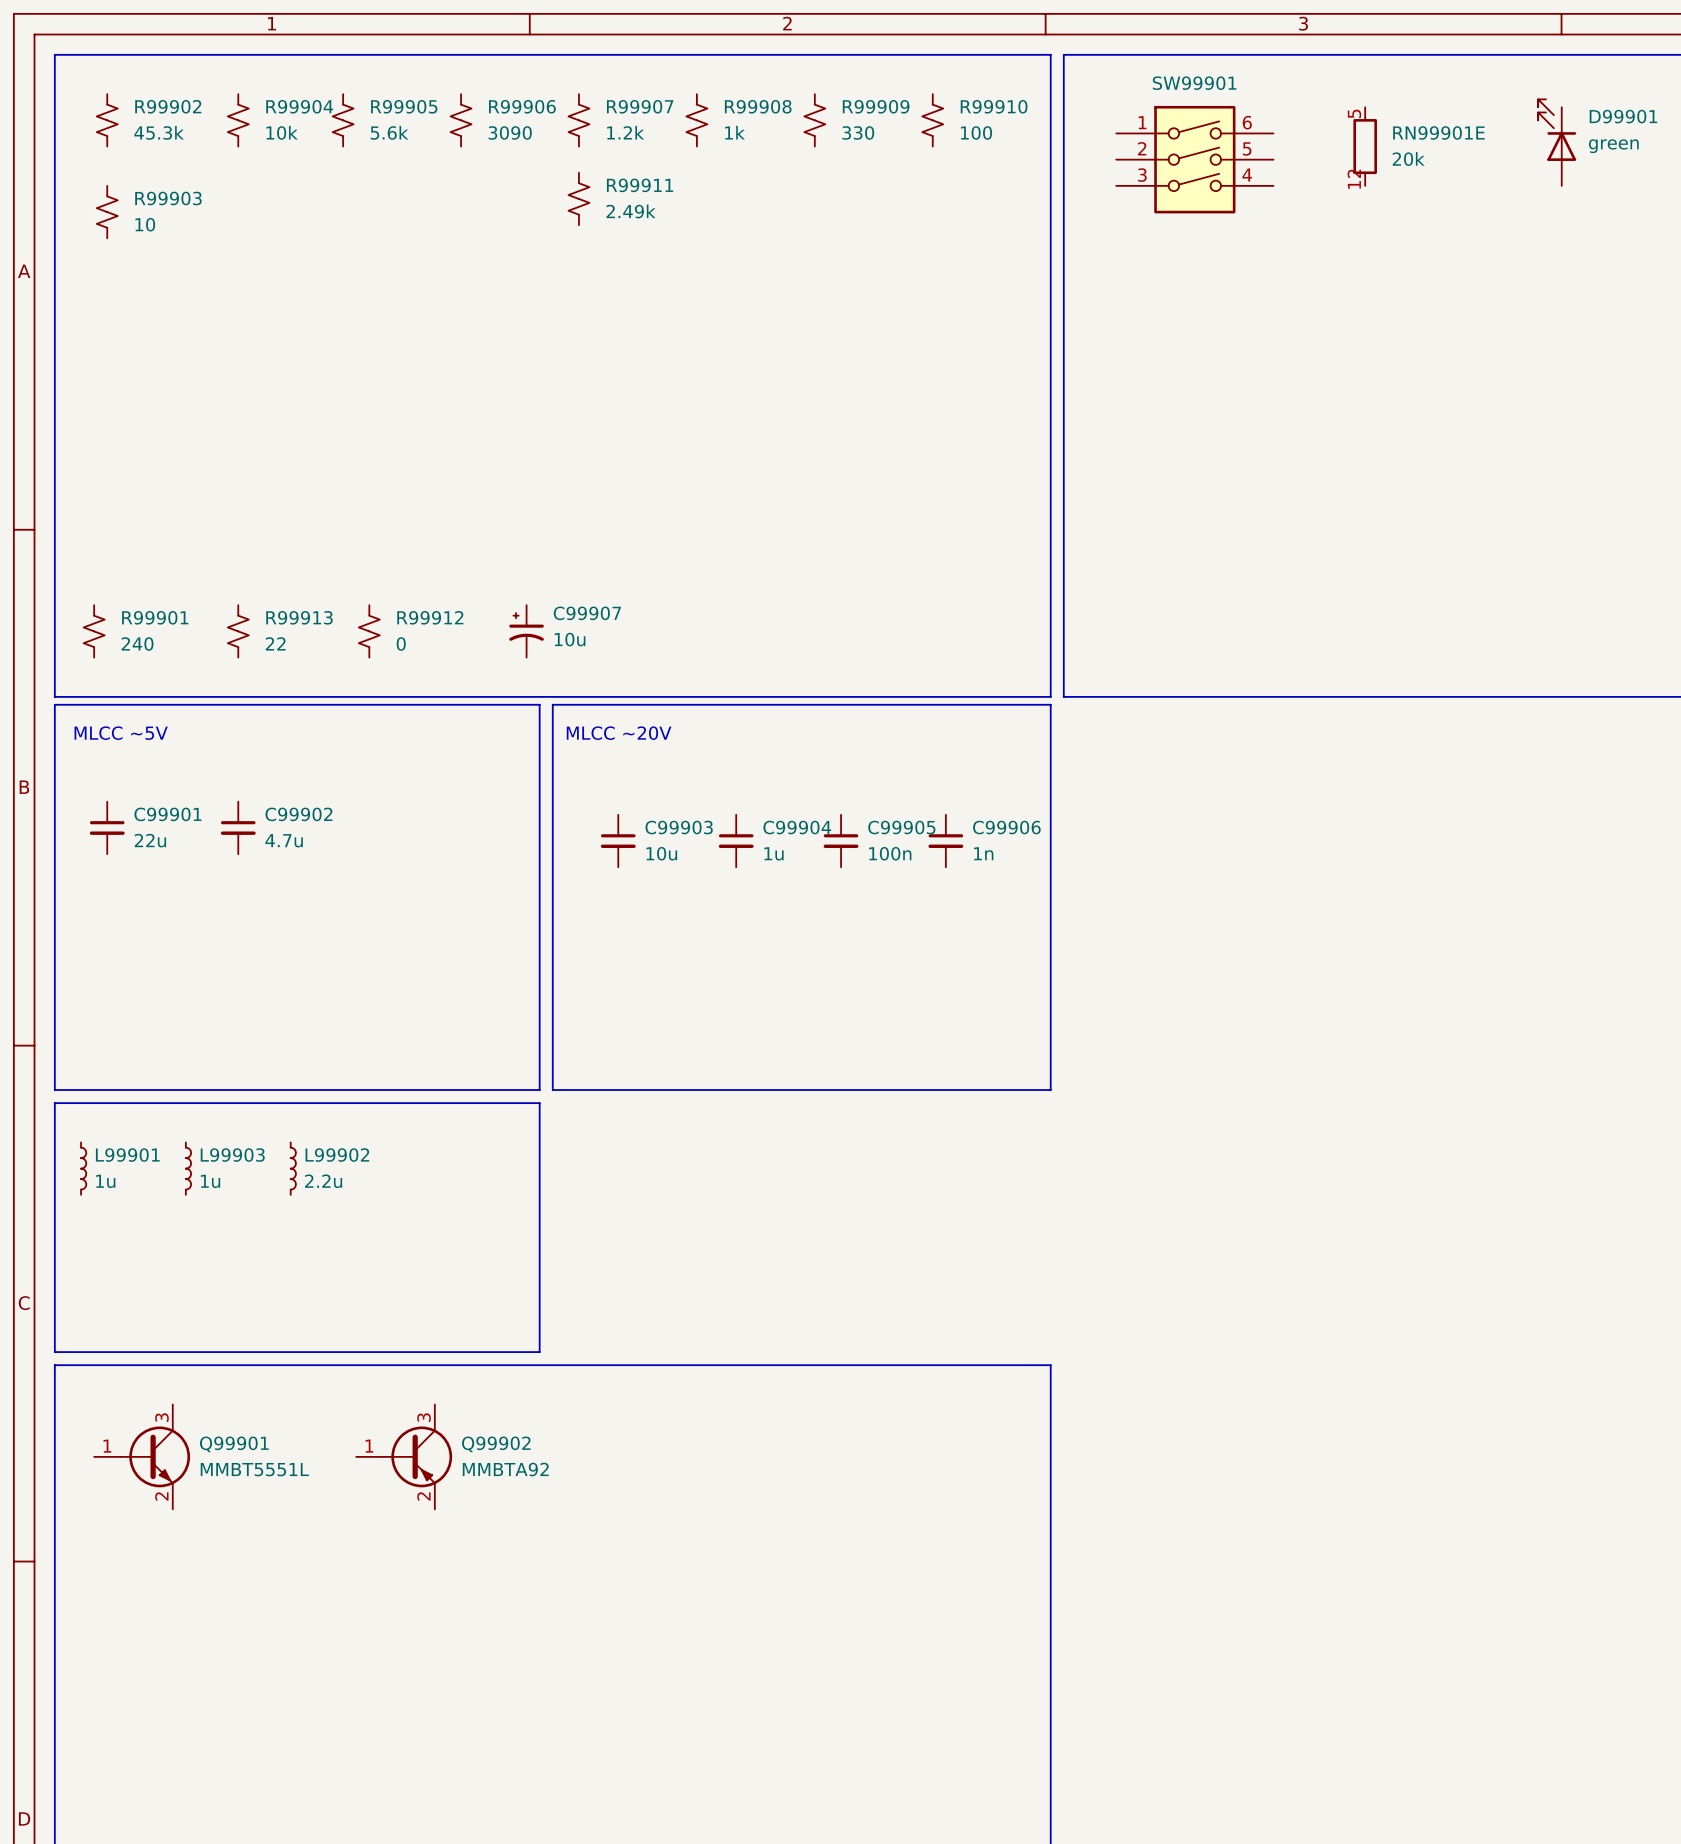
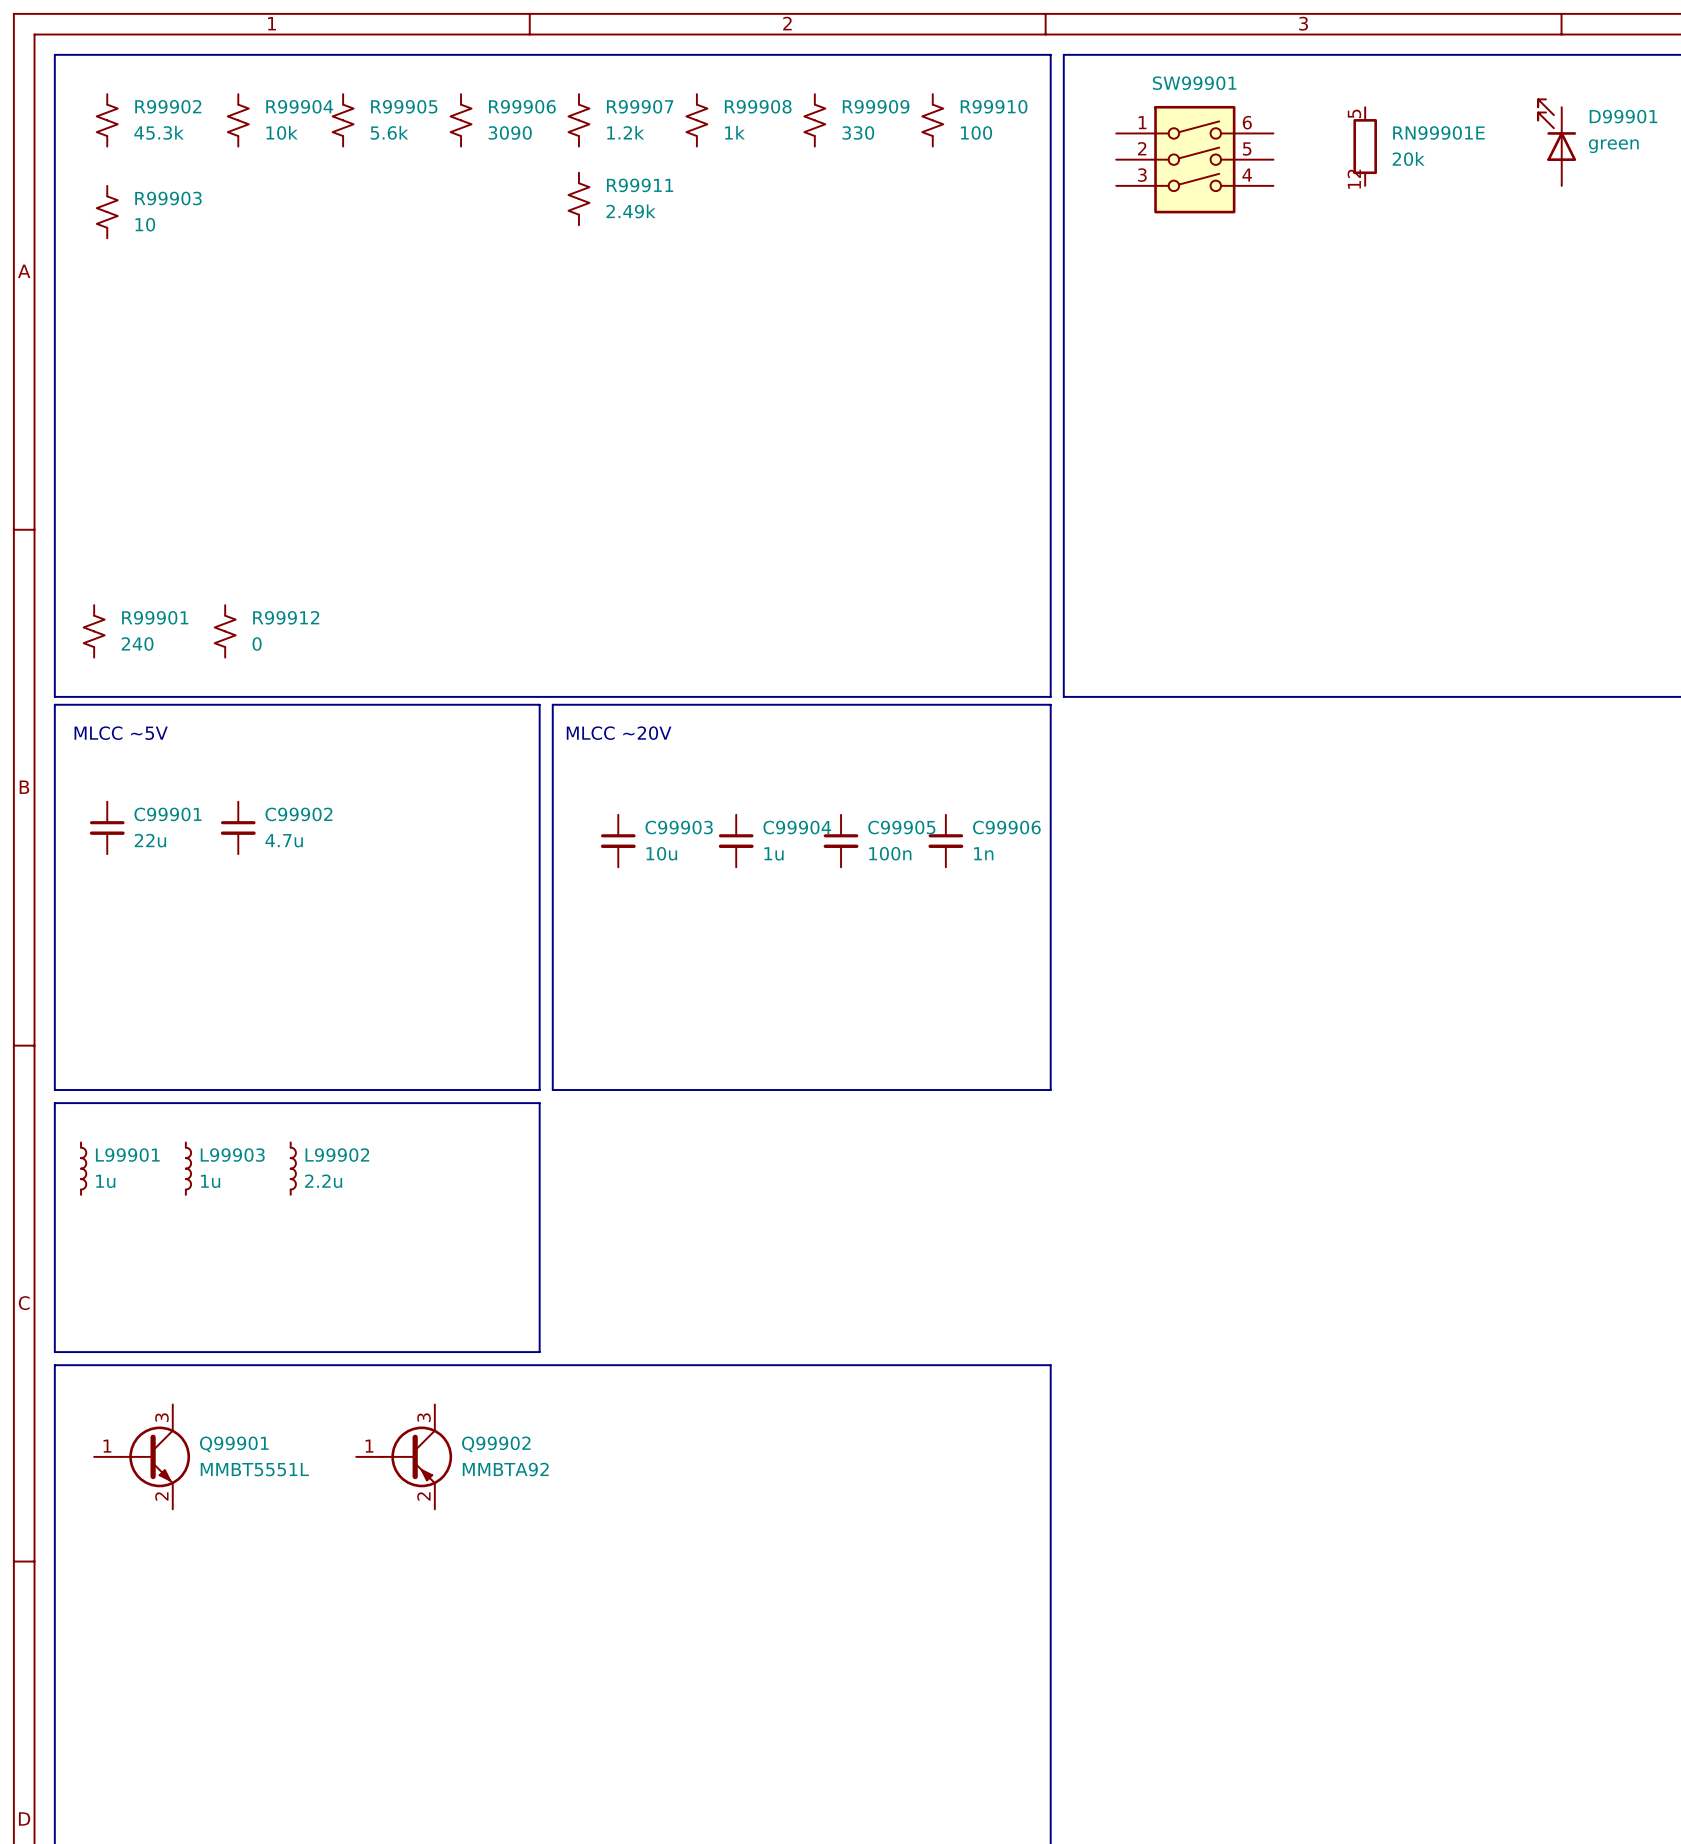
R99913: 22 (238, 631) -> none
R99912 position: (369, 631) -> (225, 631)
C99907: 10u (526, 631) -> none

